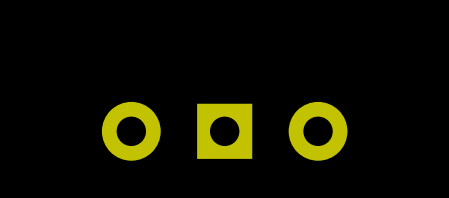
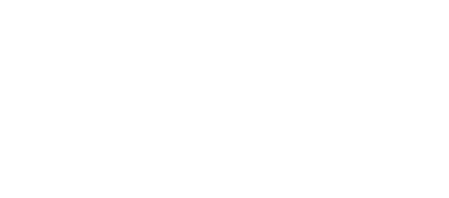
part: (224, 131) -> none

